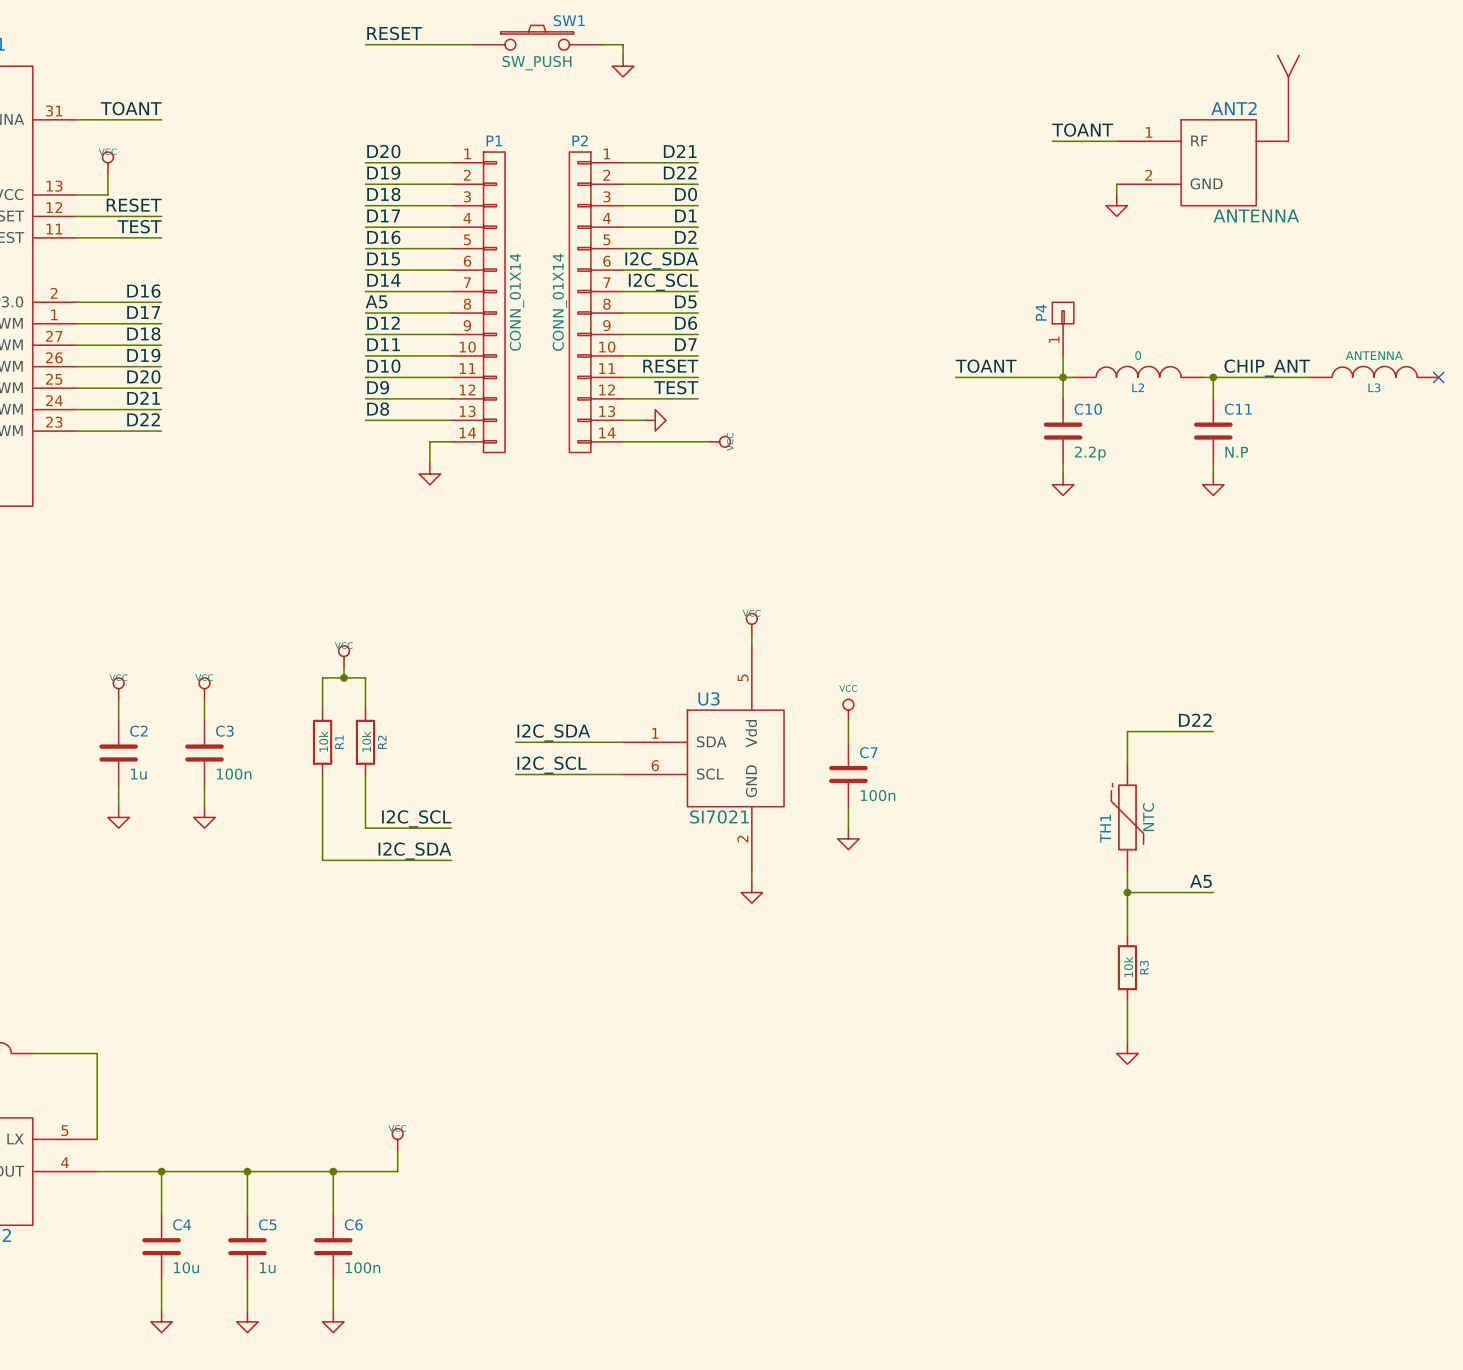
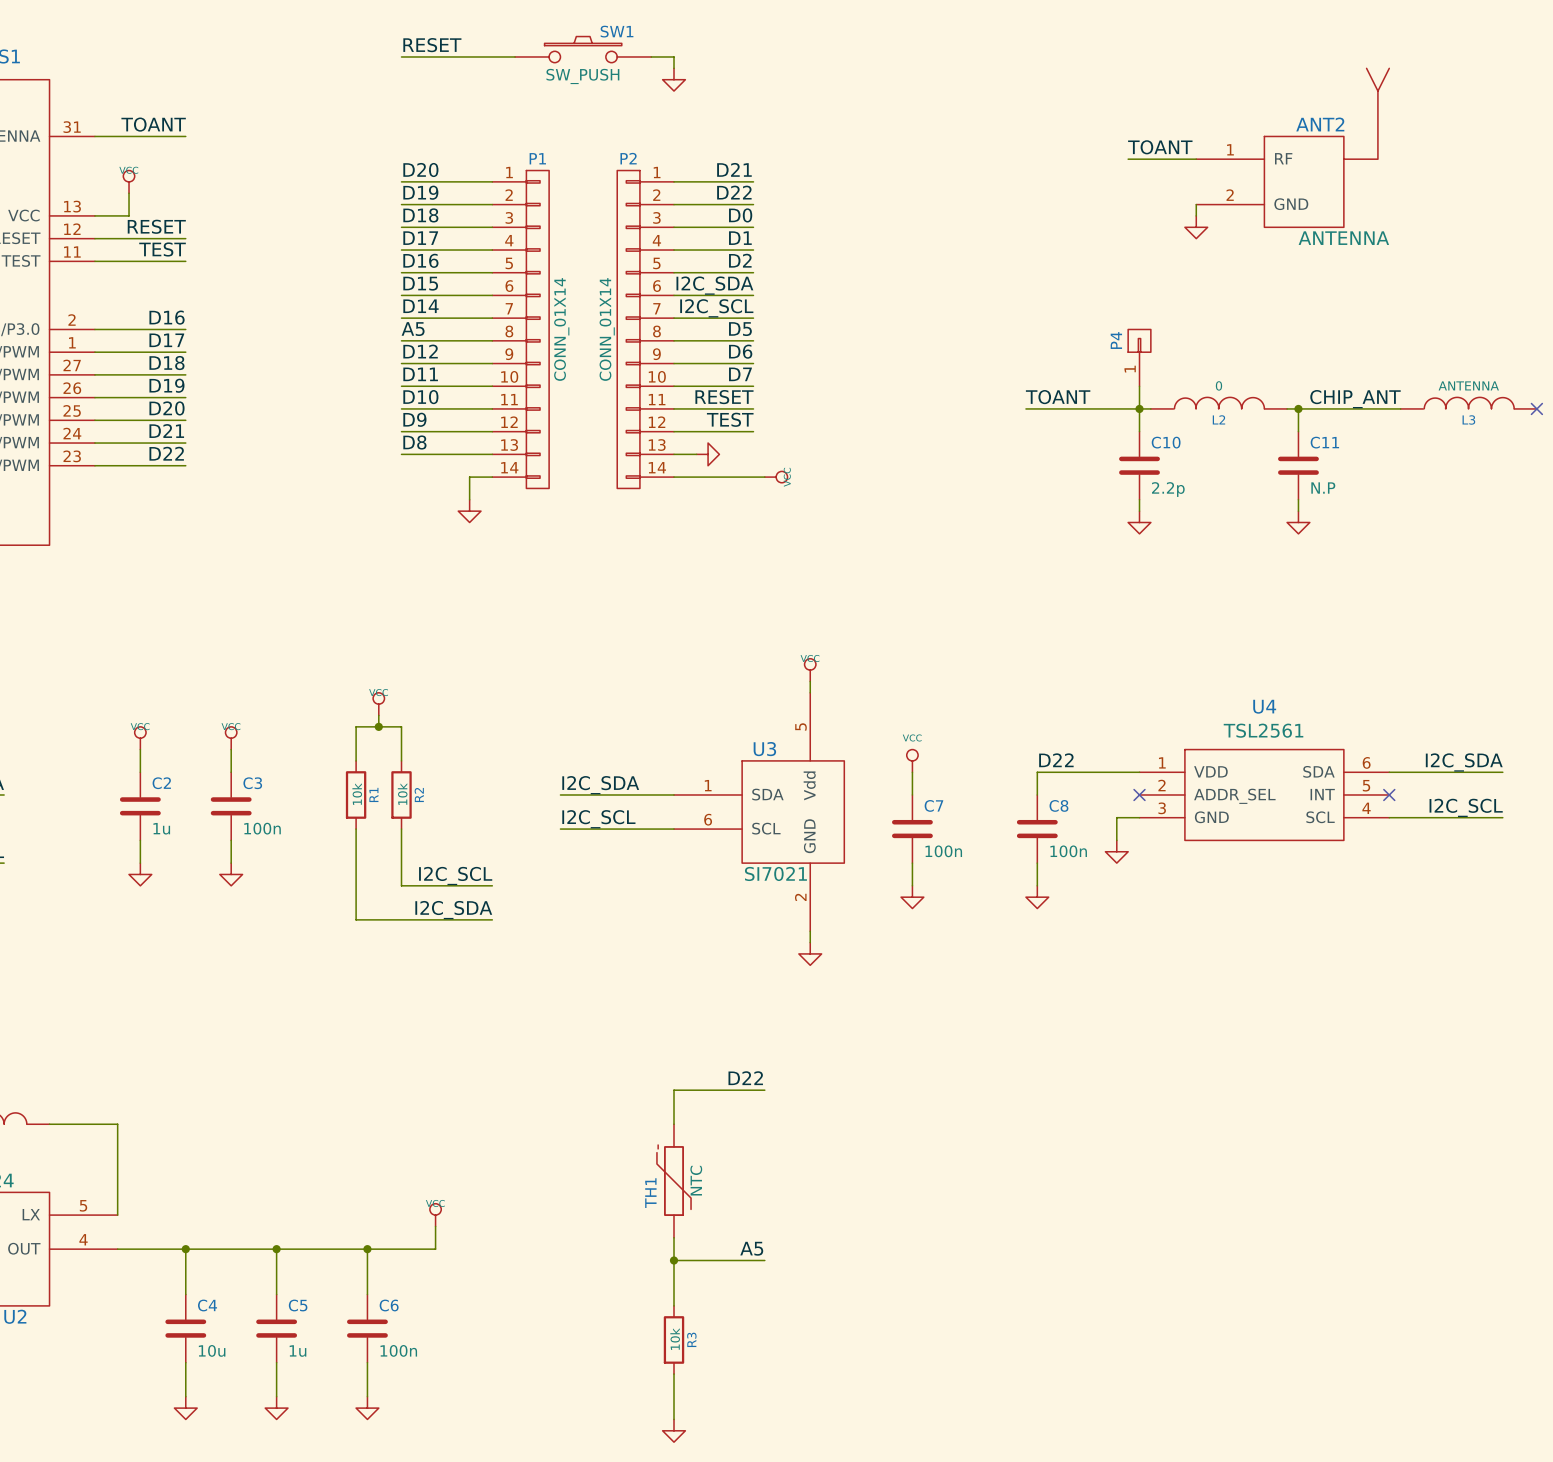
label: none -> D22 (1056, 760)
label: none -> I2C_SDA (1464, 762)
wire: none -> (1139, 772) (1037, 772) (1037, 794)
label: D22 (1195, 720) -> none
wire: none -> (1389, 772) (1502, 772)
wire: (1213, 731) (1127, 731) (1127, 763) -> none
no-connect mark: none -> (1139, 794)
U4: none -> TSL2561 (1264, 794)
no-connect mark: none -> (1389, 794)
label: none -> I2C_SCL (1466, 807)
wire: none -> (1139, 817) (1116, 817) (1116, 840)
wire: none -> (1389, 817) (1502, 817)
C8: none -> 100n (1037, 829)
power symbol: none -> (1116, 851)
wire: none -> (1037, 863) (1037, 885)
TH1 position: (1127, 817) -> (674, 1181)
power symbol: none -> (1037, 897)
wire: (1127, 871) (1127, 935) -> none
label: A5 (1200, 881) -> none
wire: (1127, 892) (1213, 892) -> none
junction: (1127, 892) -> none
R3 position: (1127, 967) -> (674, 1339)
wire: (1127, 999) (1127, 1042) -> none
label: none -> D22 (745, 1078)
wire: none -> (764, 1090) (674, 1090) (674, 1124)
power symbol: (1127, 1053) -> none
wire: none -> (674, 1237) (674, 1305)
label: none -> A5 (751, 1248)
wire: none -> (674, 1260) (764, 1260)
junction: none -> (674, 1260)
wire: none -> (674, 1374) (674, 1419)
power symbol: none -> (674, 1430)

